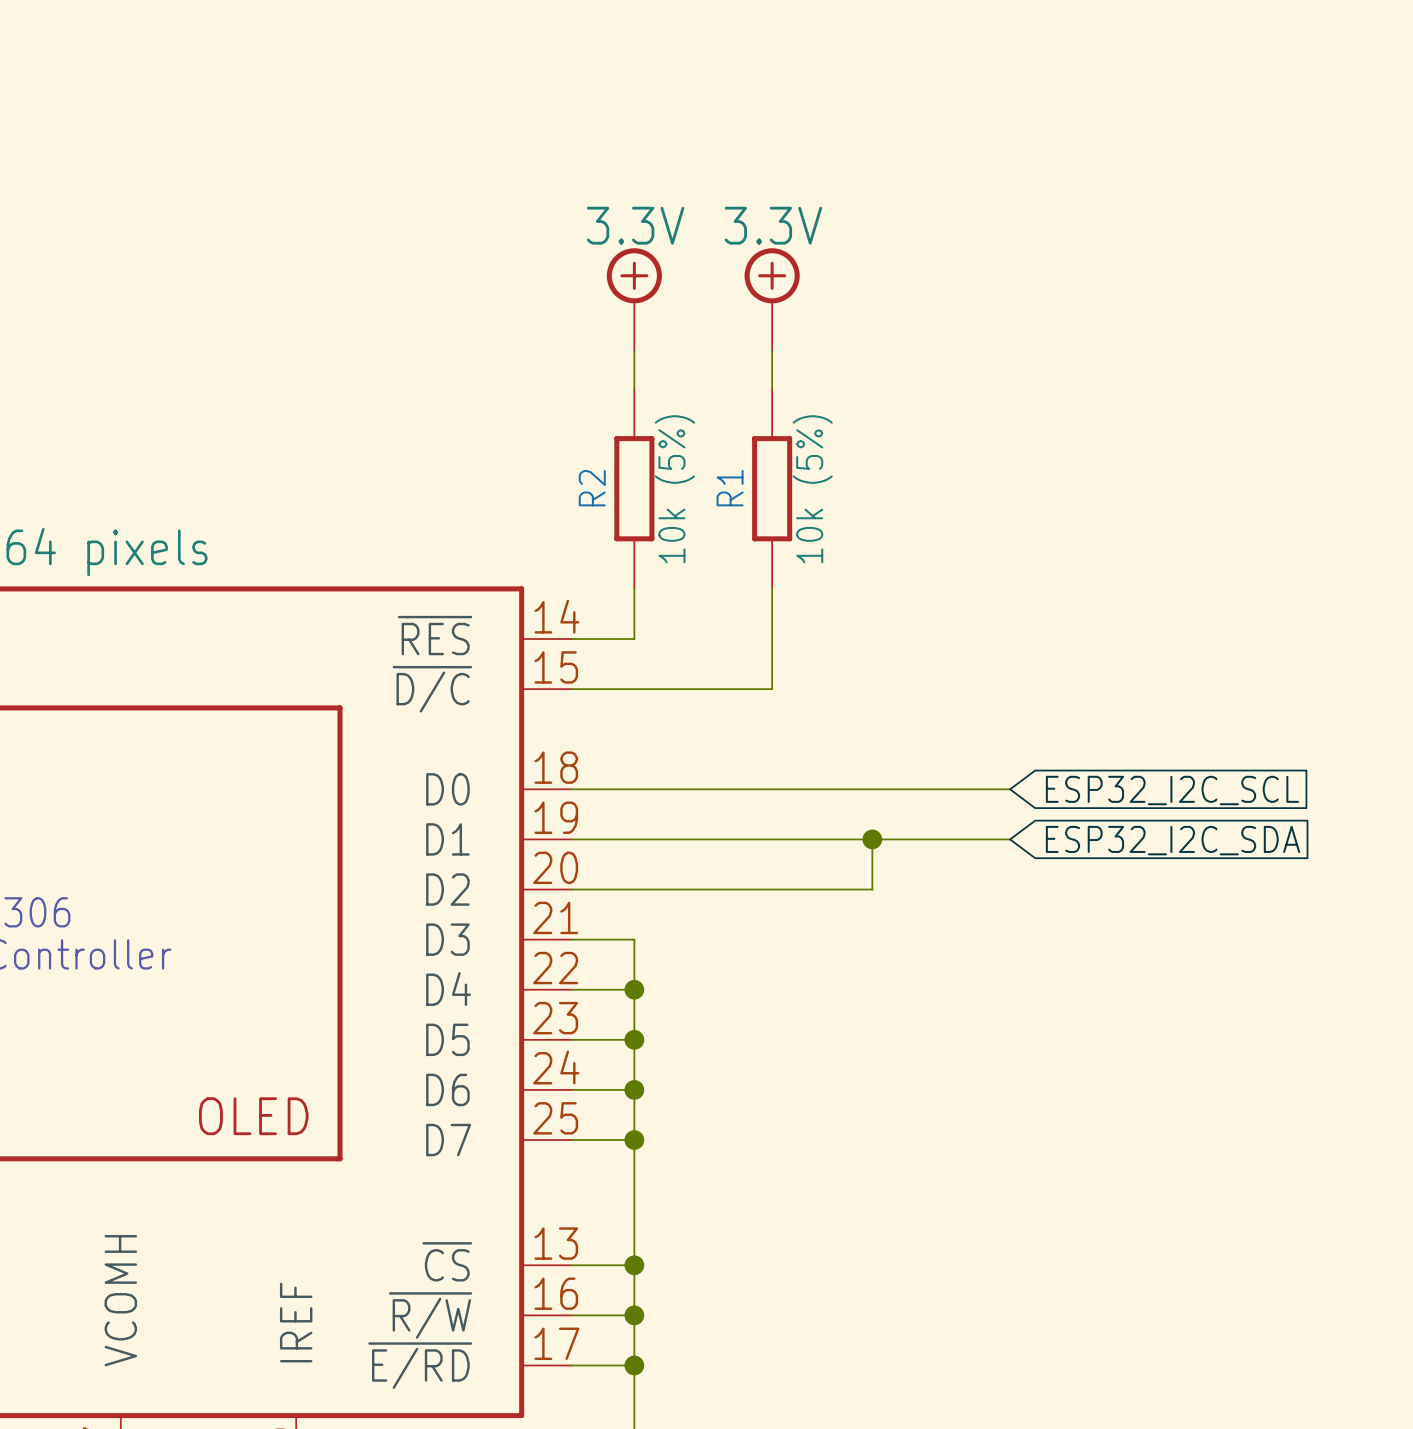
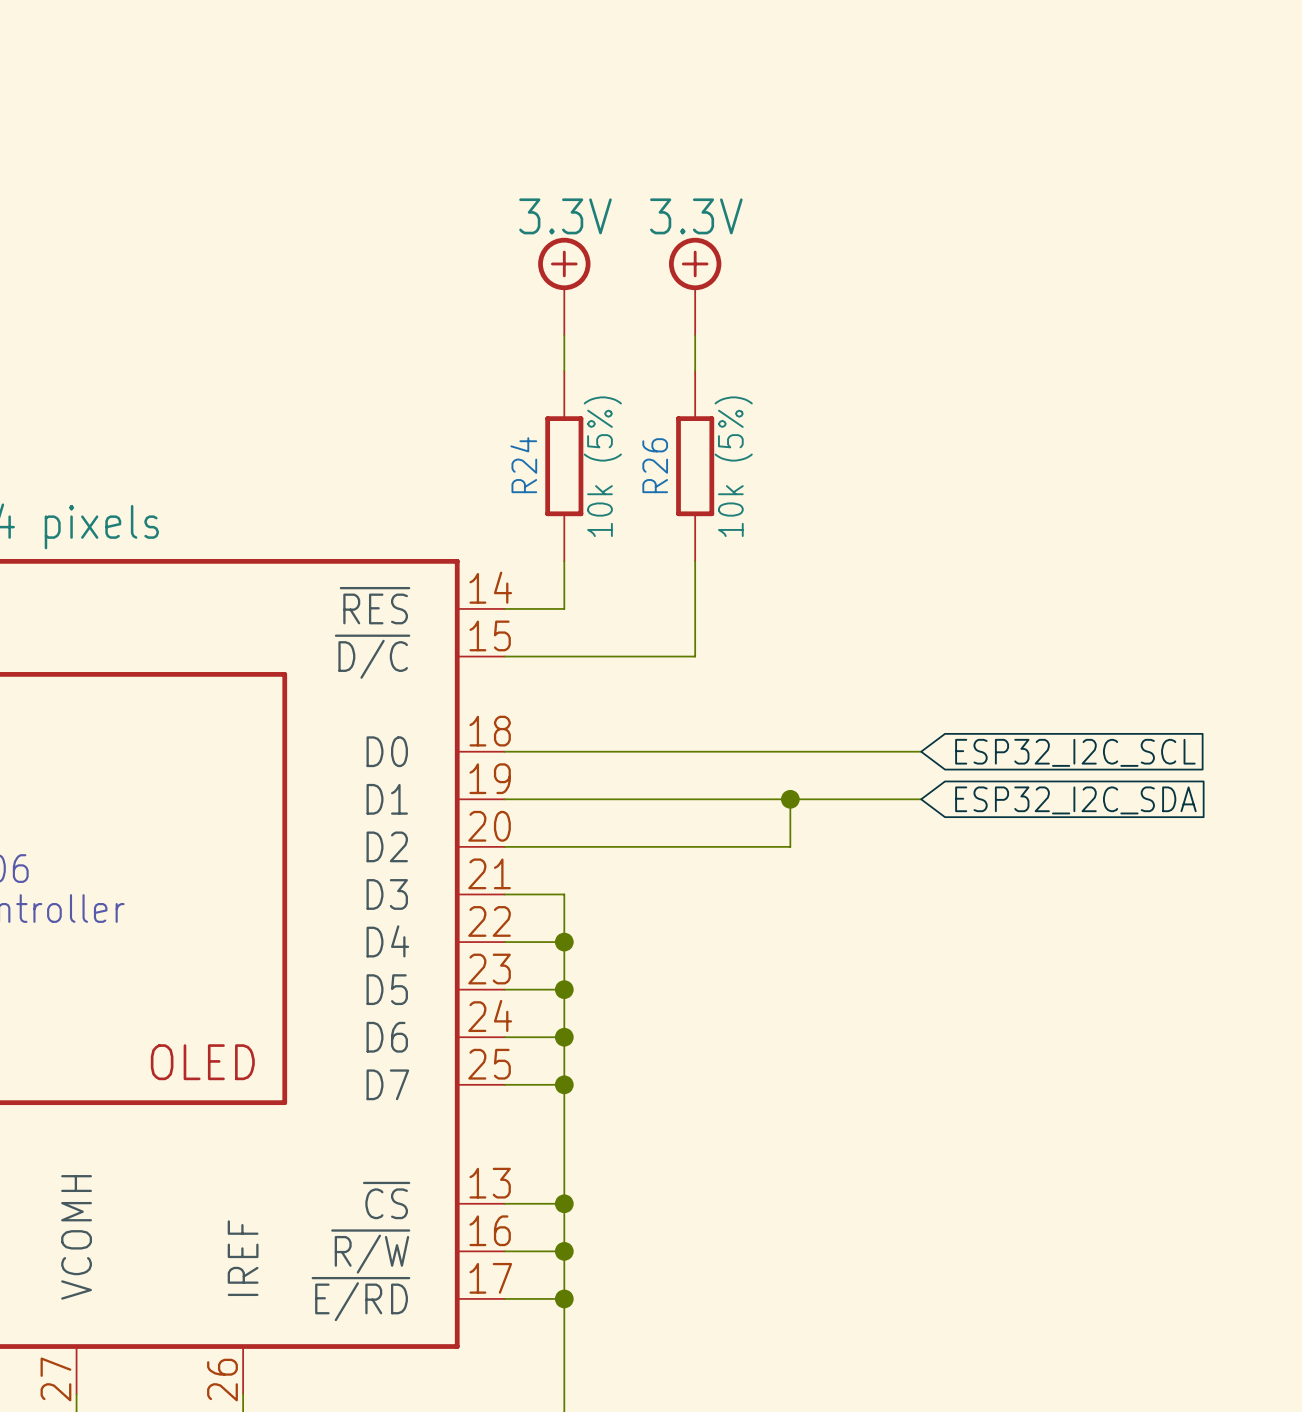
R2 name: R2 (592, 488) -> R24 (523, 465)
R1 name: R1 (730, 488) -> R26 (655, 465)

